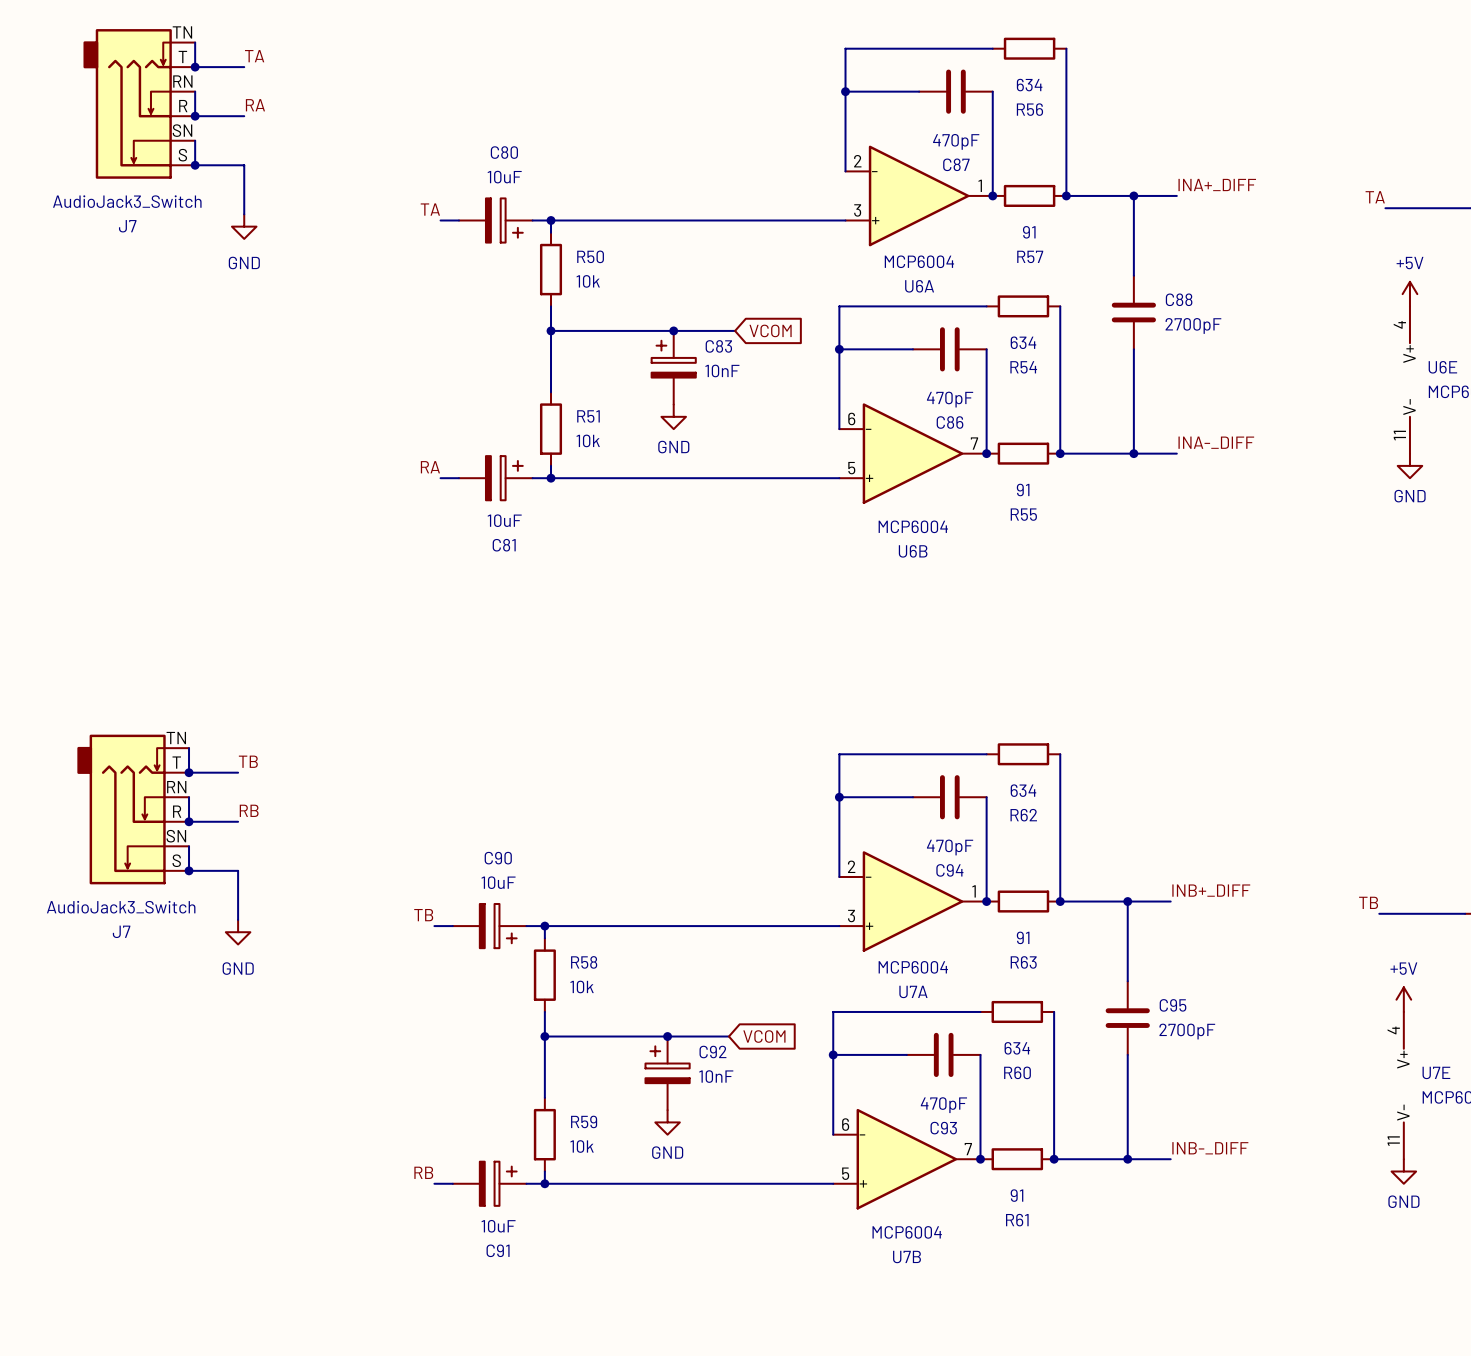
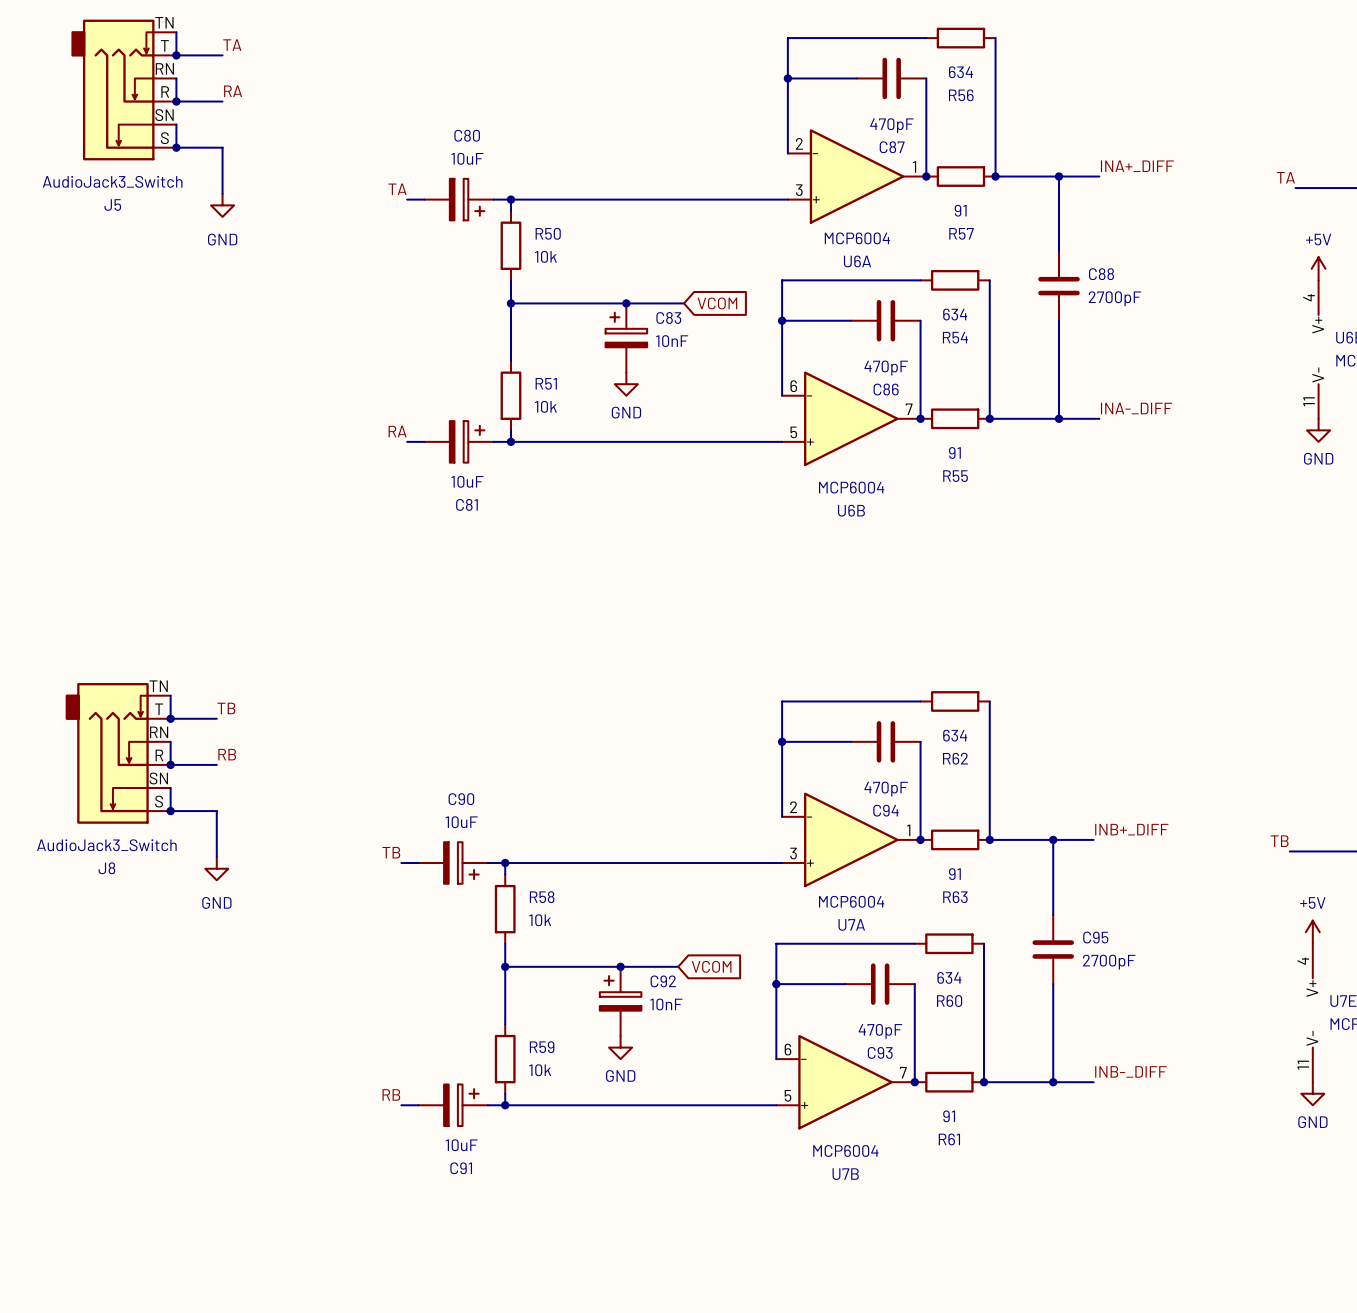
J7 name: J7 (127, 226) -> J5 (112, 205)
J7 name: J7 (121, 931) -> J8 (106, 868)

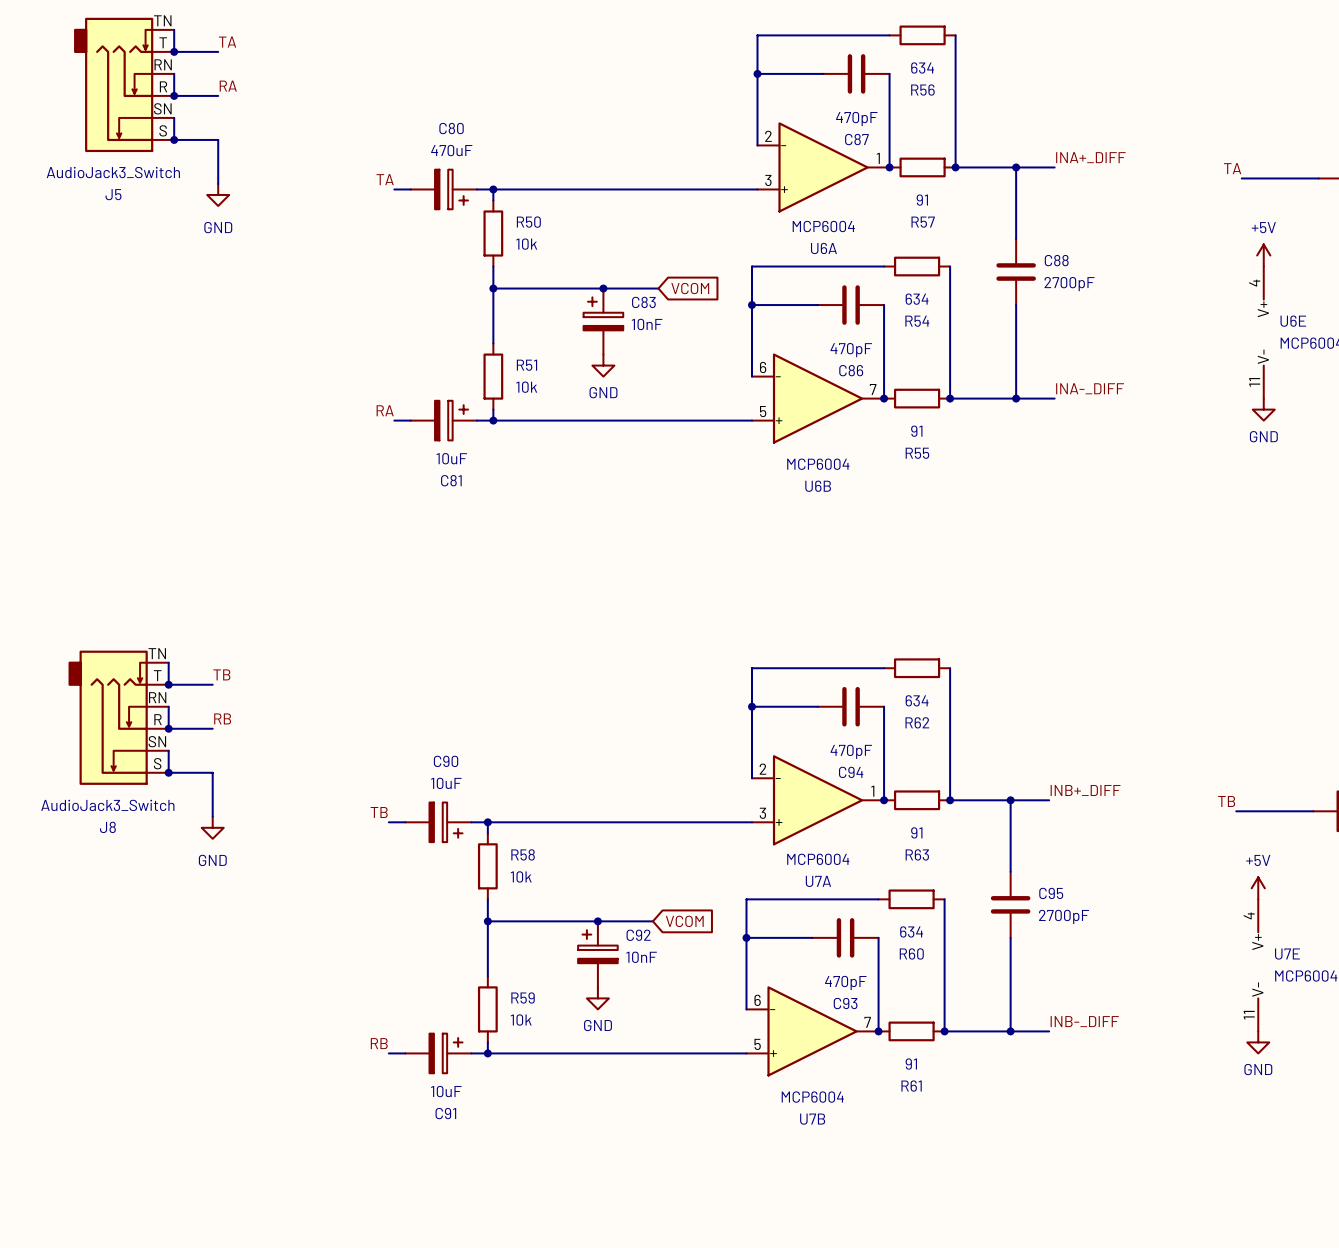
C80 value: 10uF (467, 158) -> 470uF (451, 150)

